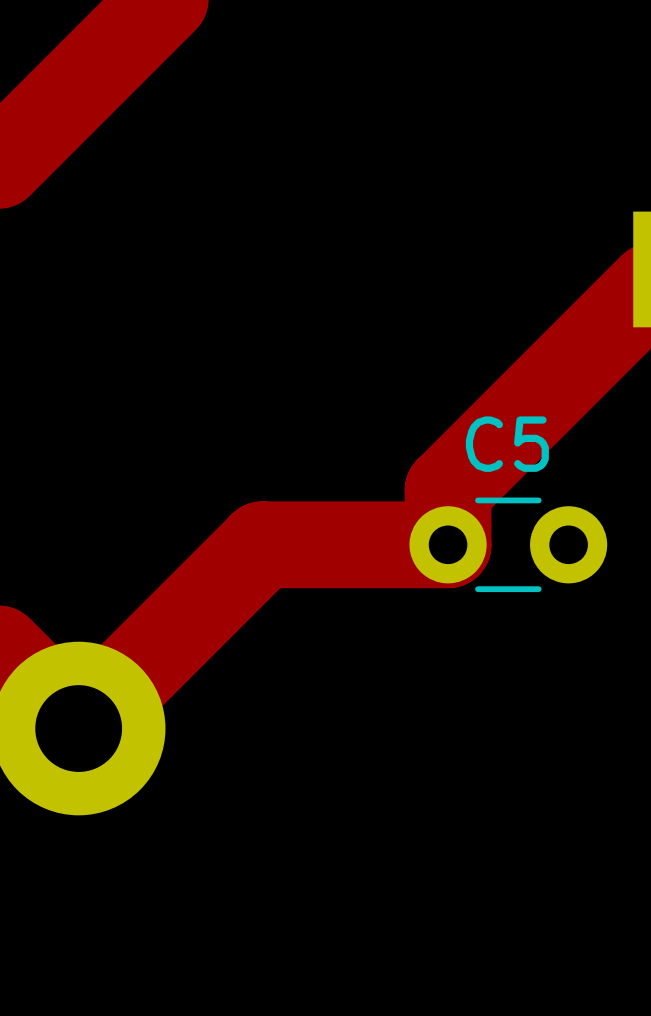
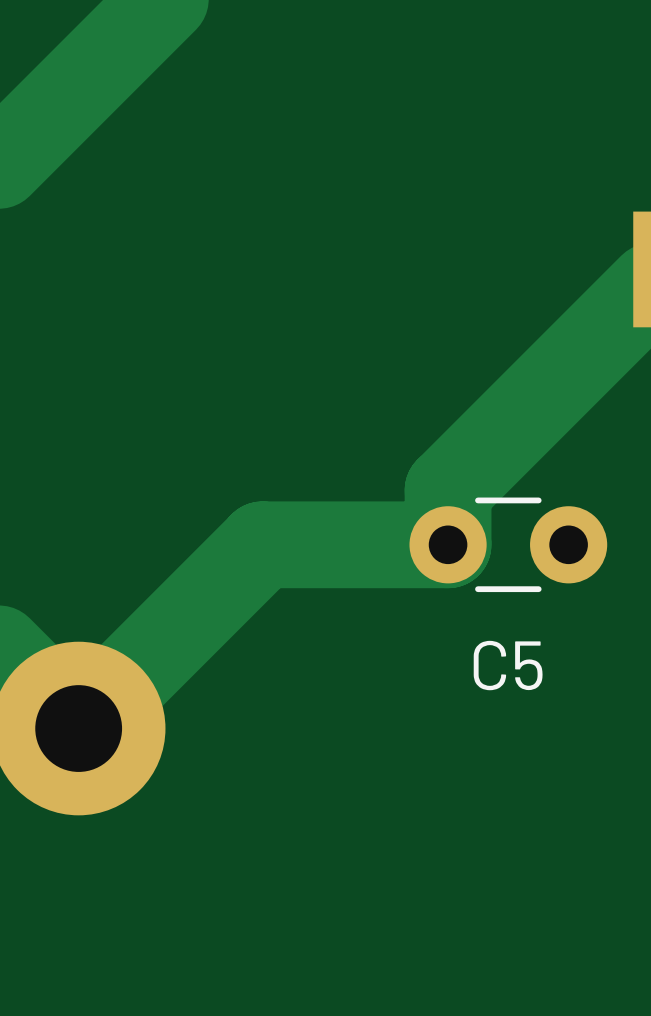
C5 name position: C5 (507, 444) -> C5 (508, 665)

